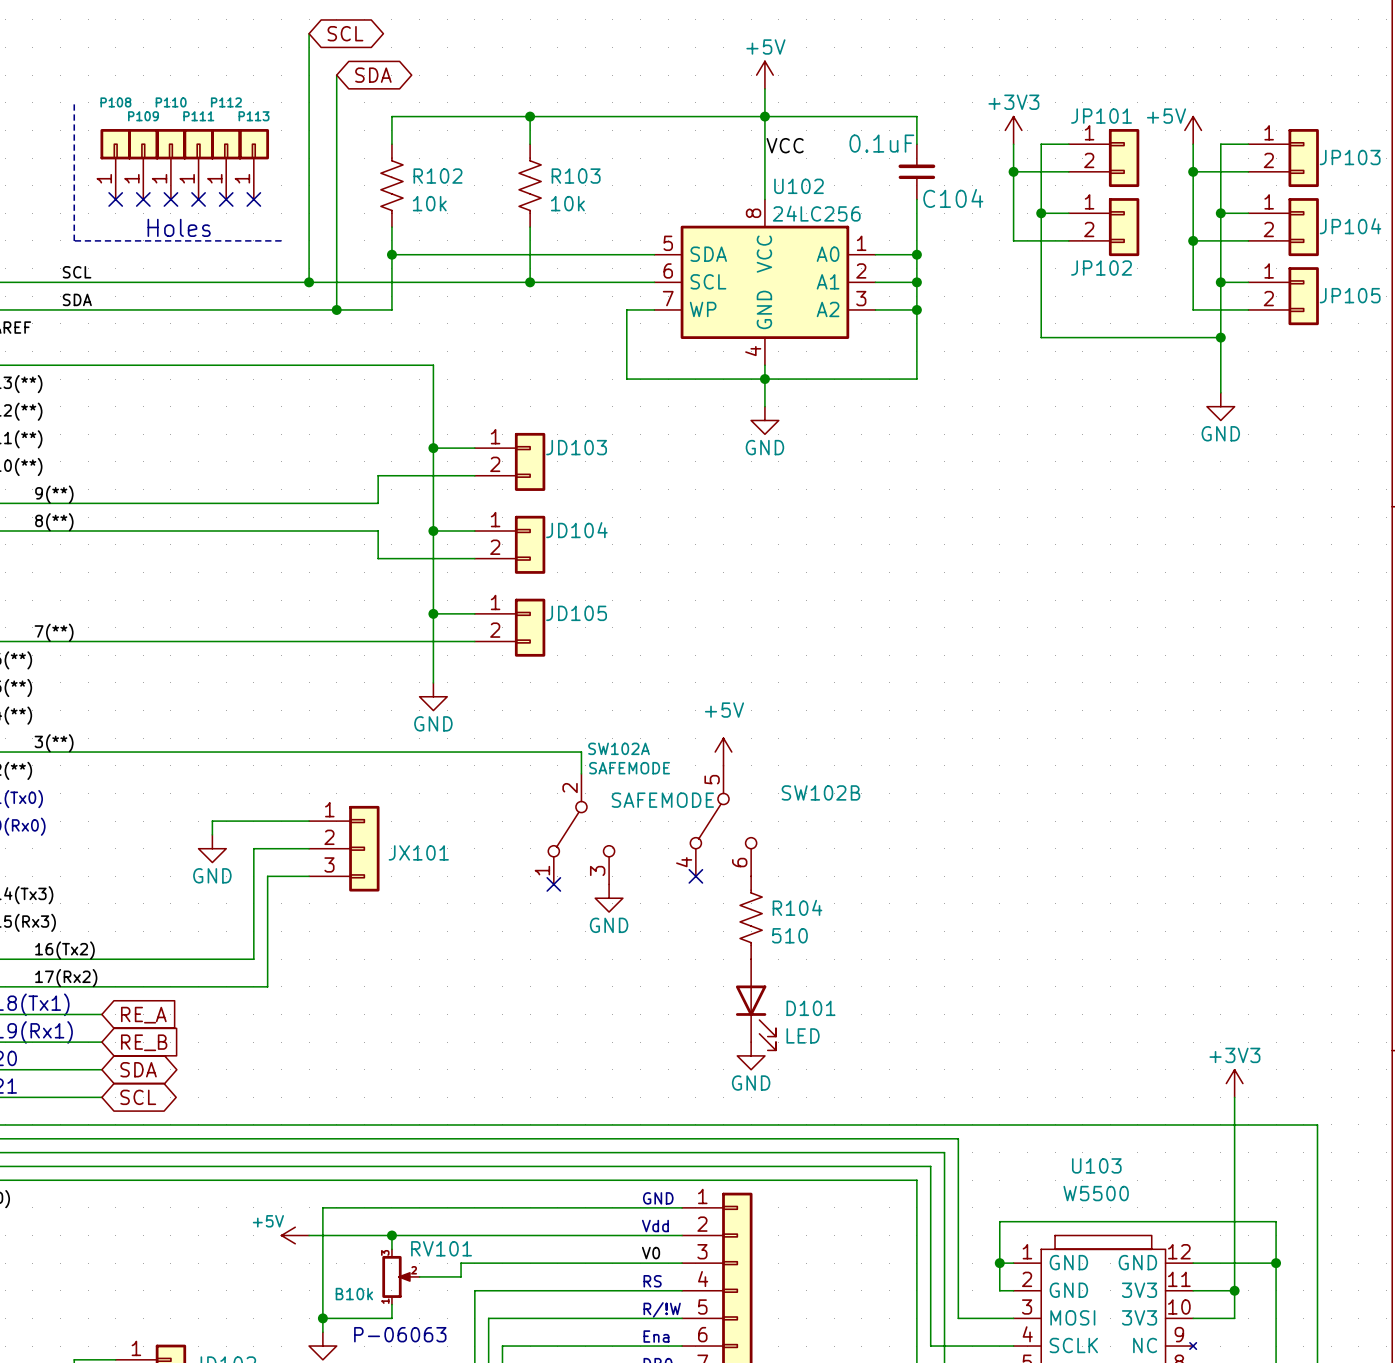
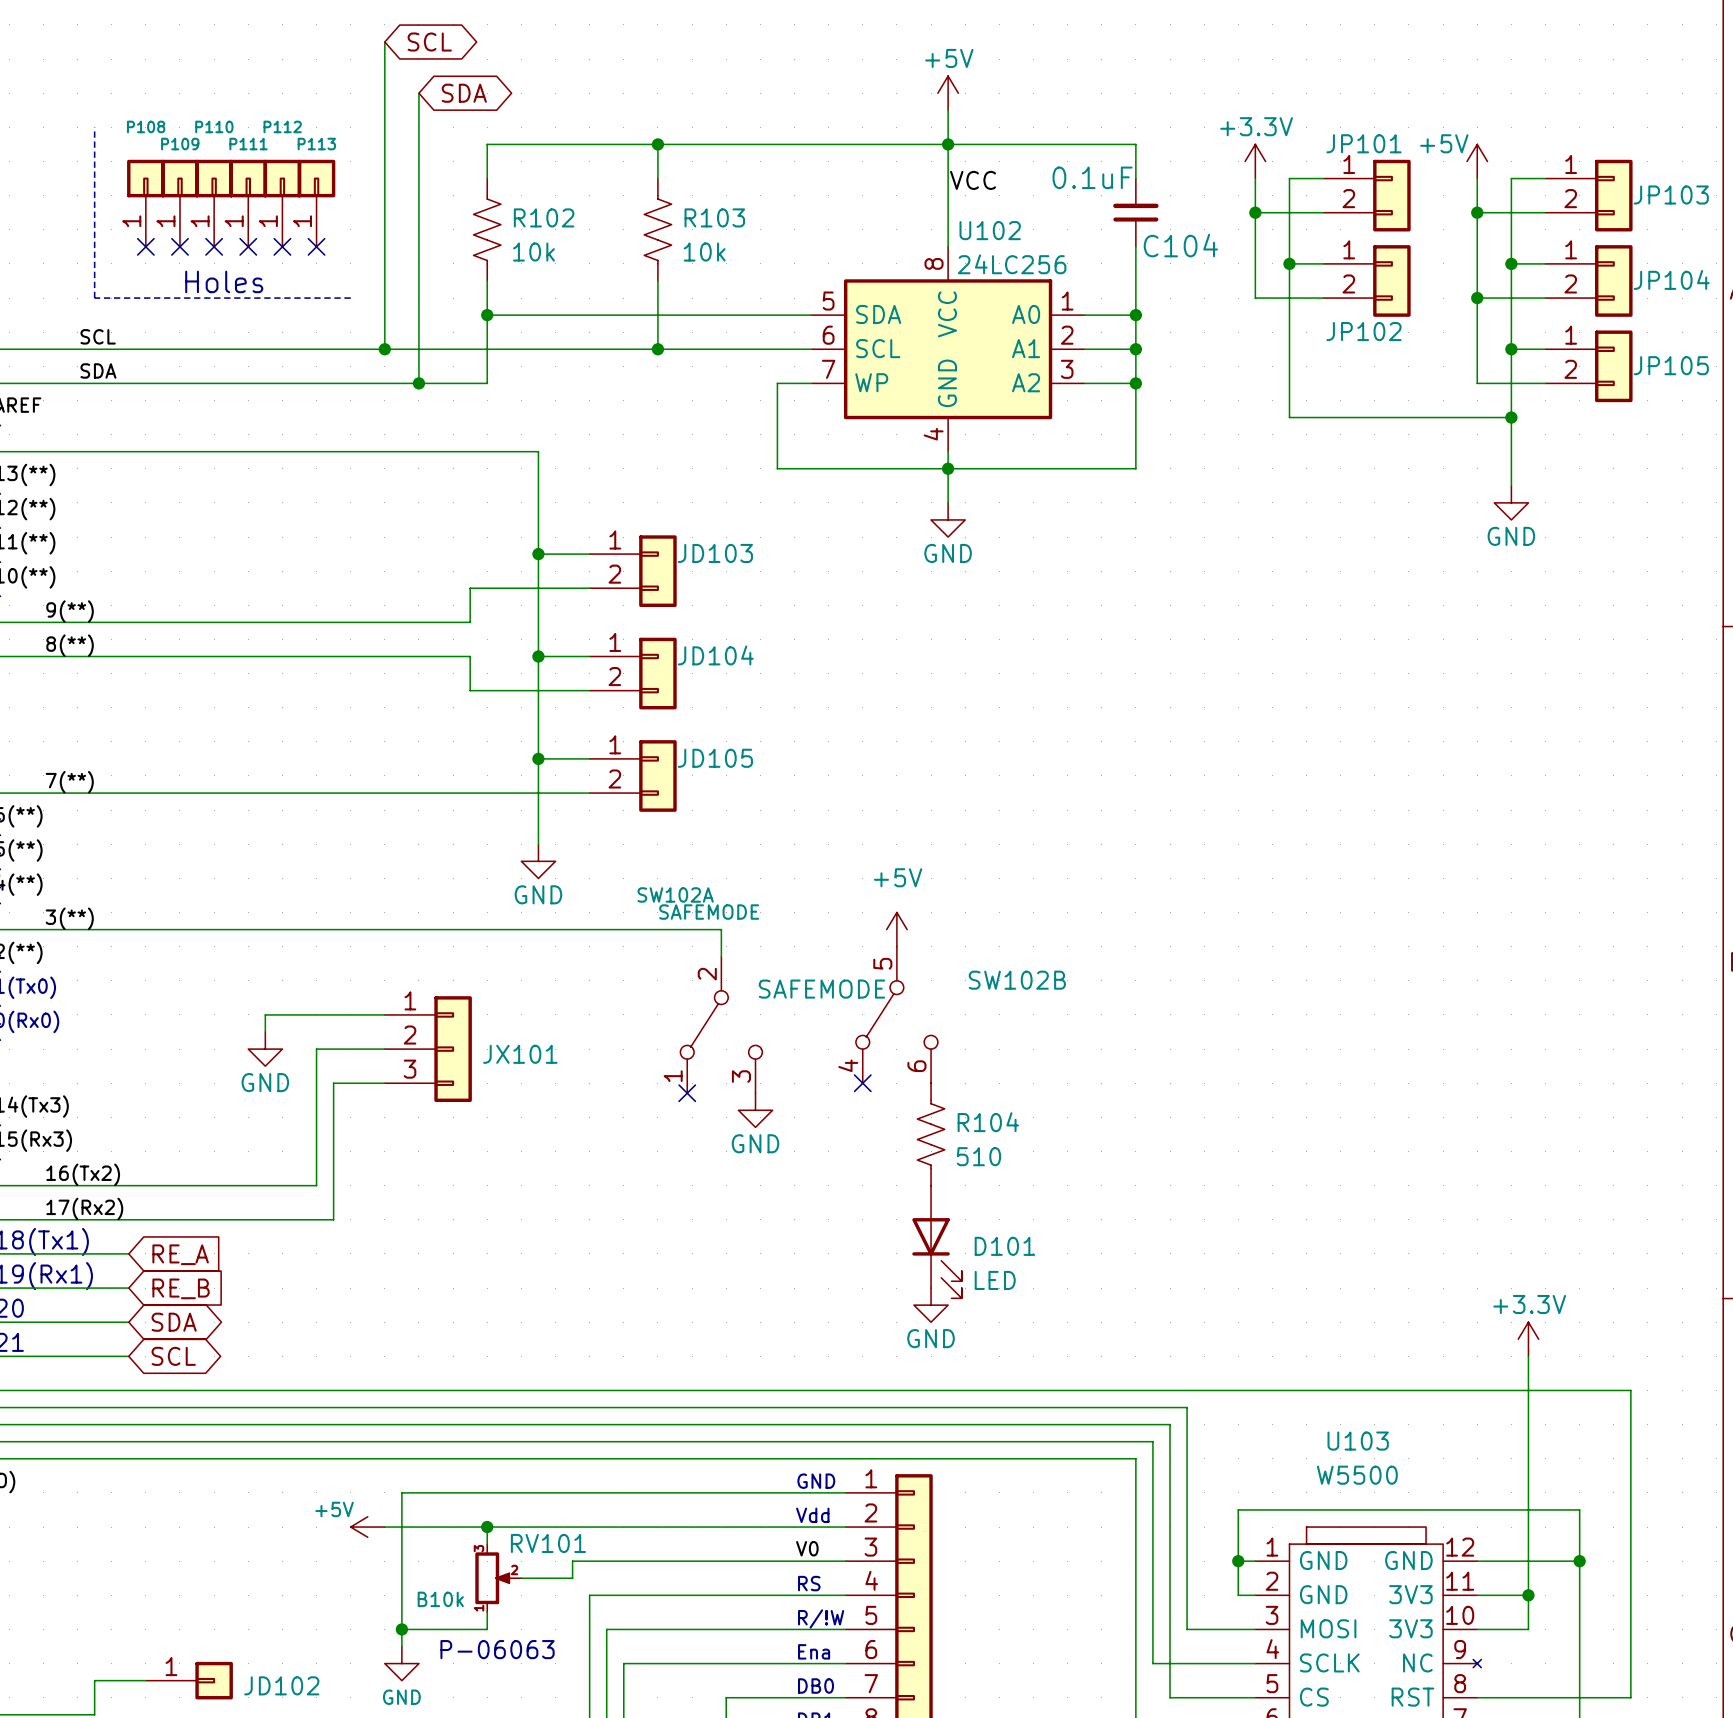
power symbol: +3V3 (1013, 130) -> +3.3V (1255, 161)
SW102A name position: SW102A (619, 748) -> SW102A (675, 894)
SW102A value position: SAFEMODE (629, 768) -> SAFEMODE (709, 912)
power symbol: +3V3 (1234, 1083) -> +3.3V (1528, 1339)

